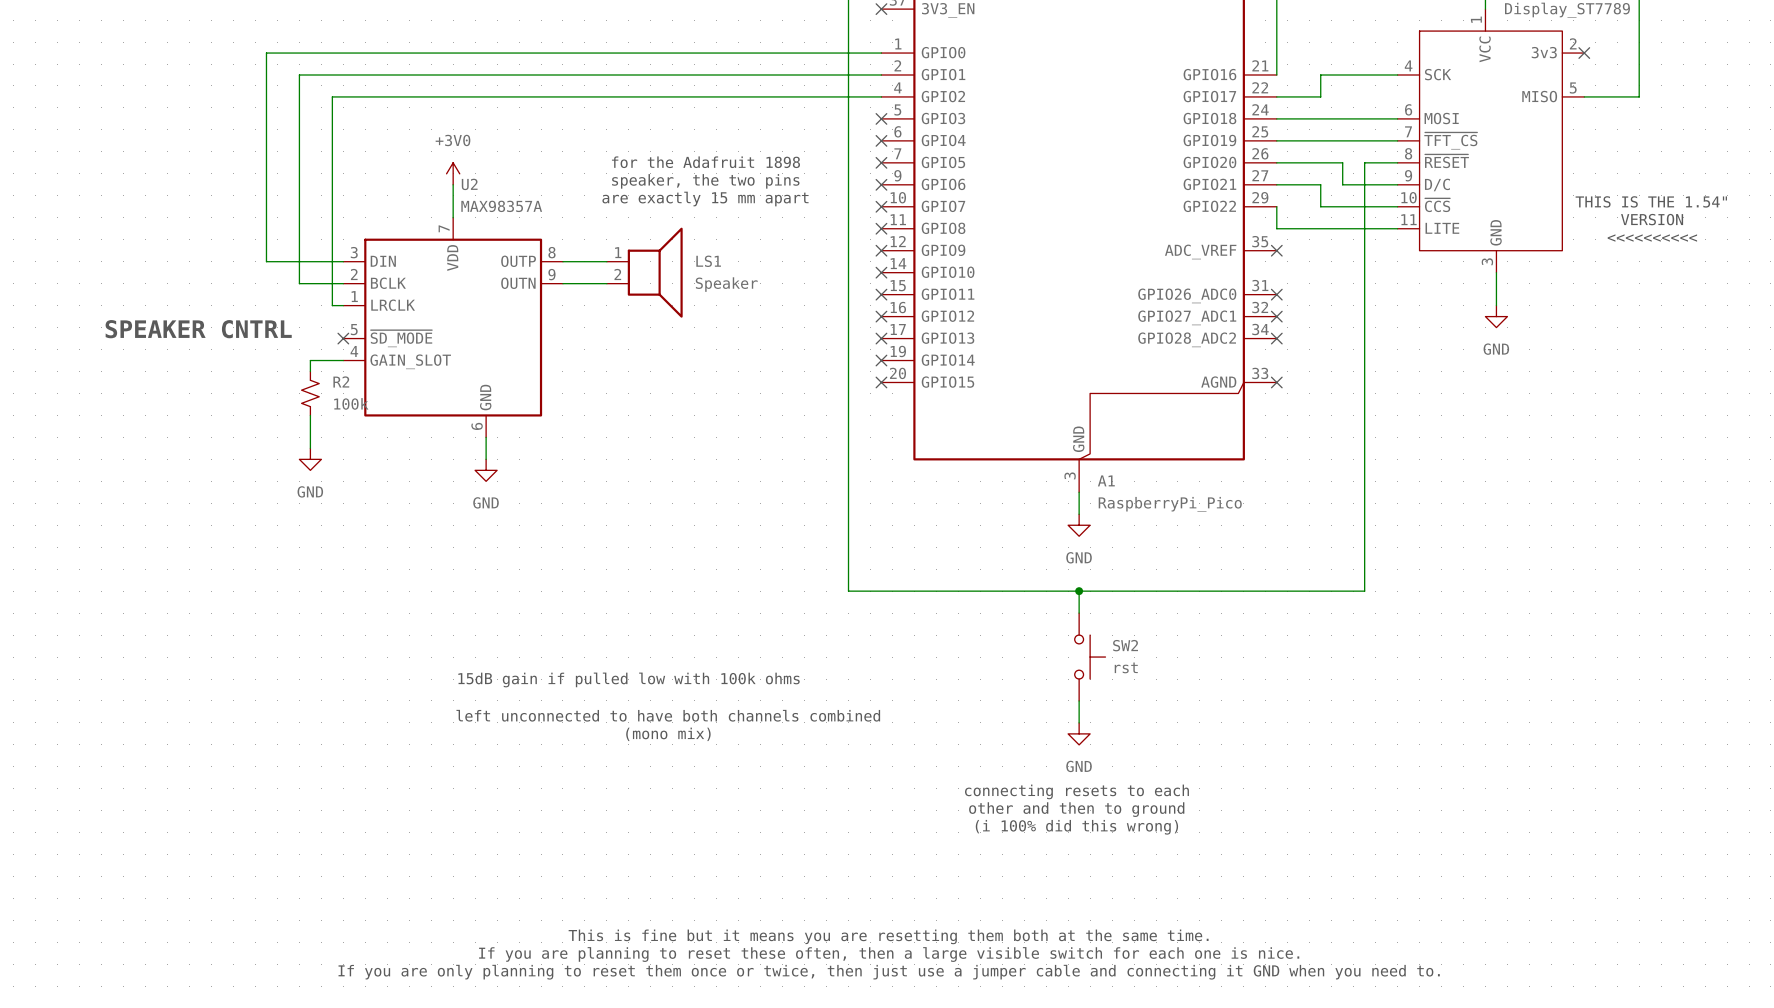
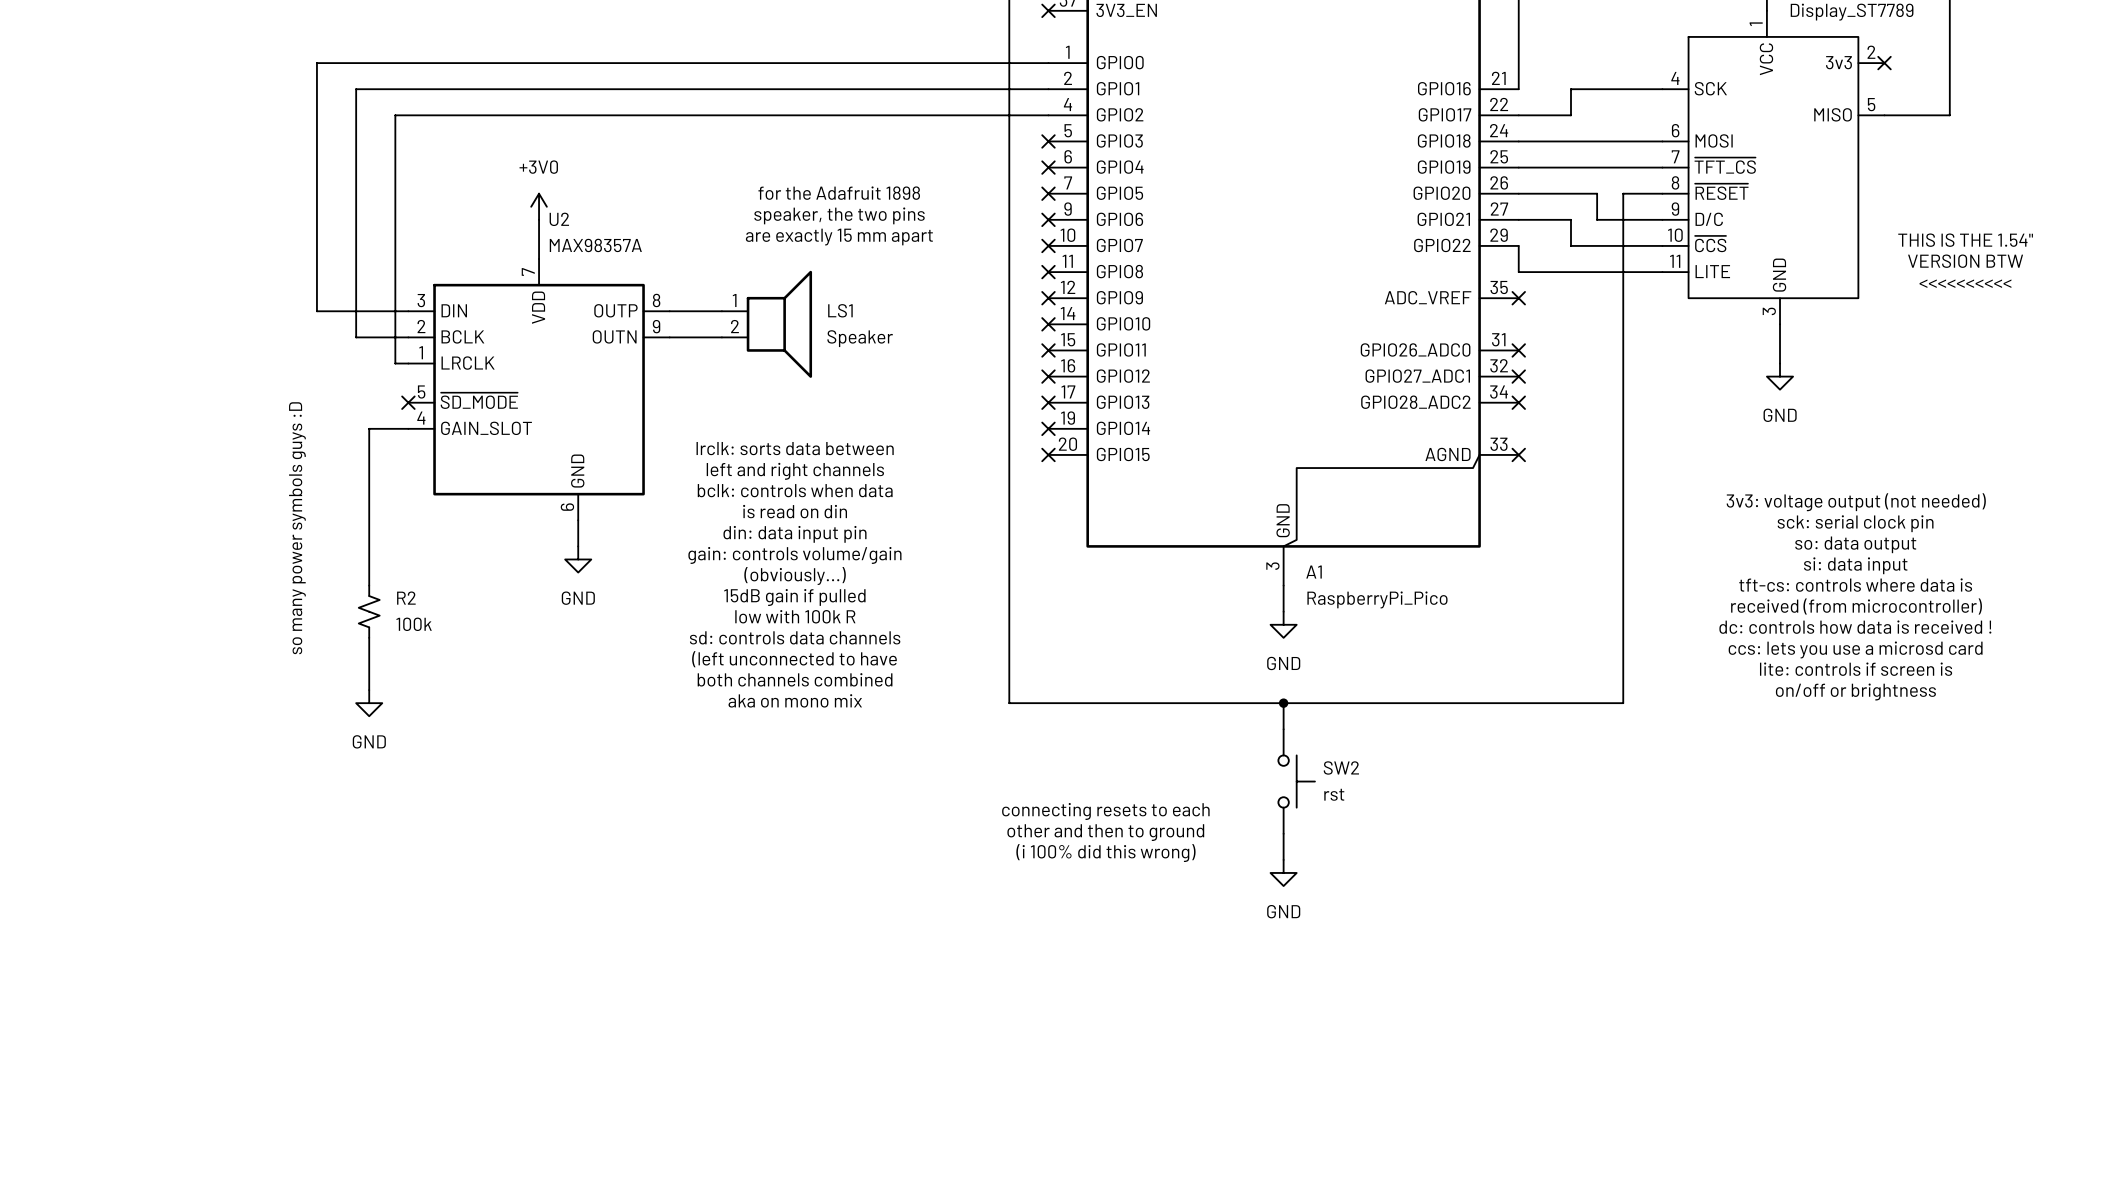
text: VERSION (1652, 219) -> VERSION BTW (1965, 261)
text: SPEAKER CNTRL (198, 329) -> none
text: none -> lrclk: sorts data between (795, 448)
R2 position: (310, 393) -> (369, 611)
text: none -> left and right channels (795, 471)
text: none -> bclk: controls when data (795, 490)
text: none -> 3v3: voltage output (not needed) (1856, 502)
text: none -> is read on din (795, 511)
text: none -> sck: serial clock pin (1855, 523)
text: none -> so many power symbols guys :D (297, 528)
wire: none -> (369, 533) (369, 585)
text: none -> din: data input pin (794, 534)
text: none -> so: data output (1855, 544)
power symbol position: GND (310, 459) -> GND (369, 703)
text: none -> gain: controls volume/gain (794, 555)
text: none -> si: data input (1855, 565)
text: none -> (obviously...) (795, 575)
text: none -> tft-cs: controls where data is (1855, 585)
text: none -> 15dB gain if pulled (794, 597)
text: none -> received (from microcontroller) (1856, 606)
text: none -> low with 100k R (795, 616)
text: none -> dc: controls how data is received ! (1855, 627)
wire: none -> (369, 637) (369, 690)
text: none -> sd: controls data channels (795, 637)
text: none -> ccs: lets you use a microsd card (1855, 649)
text: none -> (left unconnected to have (794, 659)
text: none -> lite: controls if screen is (1856, 669)
text: none -> both channels combined (795, 679)
text: none -> on/off or brightness (1855, 692)
text: none -> aka on mono mix (795, 700)
text: 15dB gain if pulled low with 100k ohms (629, 679) -> none
text: left unconnected to have both channels combined (668, 715) -> none
text: (mono mix) (668, 734) -> none
text position: connecting resets to each (1076, 791) -> connecting resets to each (1105, 811)
text position: other and then to ground (1076, 809) -> other and then to ground (1105, 832)
text position: (i 100% did this wrong) (1076, 827) -> (i 100% did this wrong) (1105, 853)
text: This is fine but it means you are resetting them both at the same time. (888, 936) -> none
text: If you are planning to reset these often, then a large visible switch for each one is nice. (889, 954) -> none
text: If you are only planning to reset them once or twice, then just use a jumper cable and connecting it GND when you need to. (889, 972) -> none

